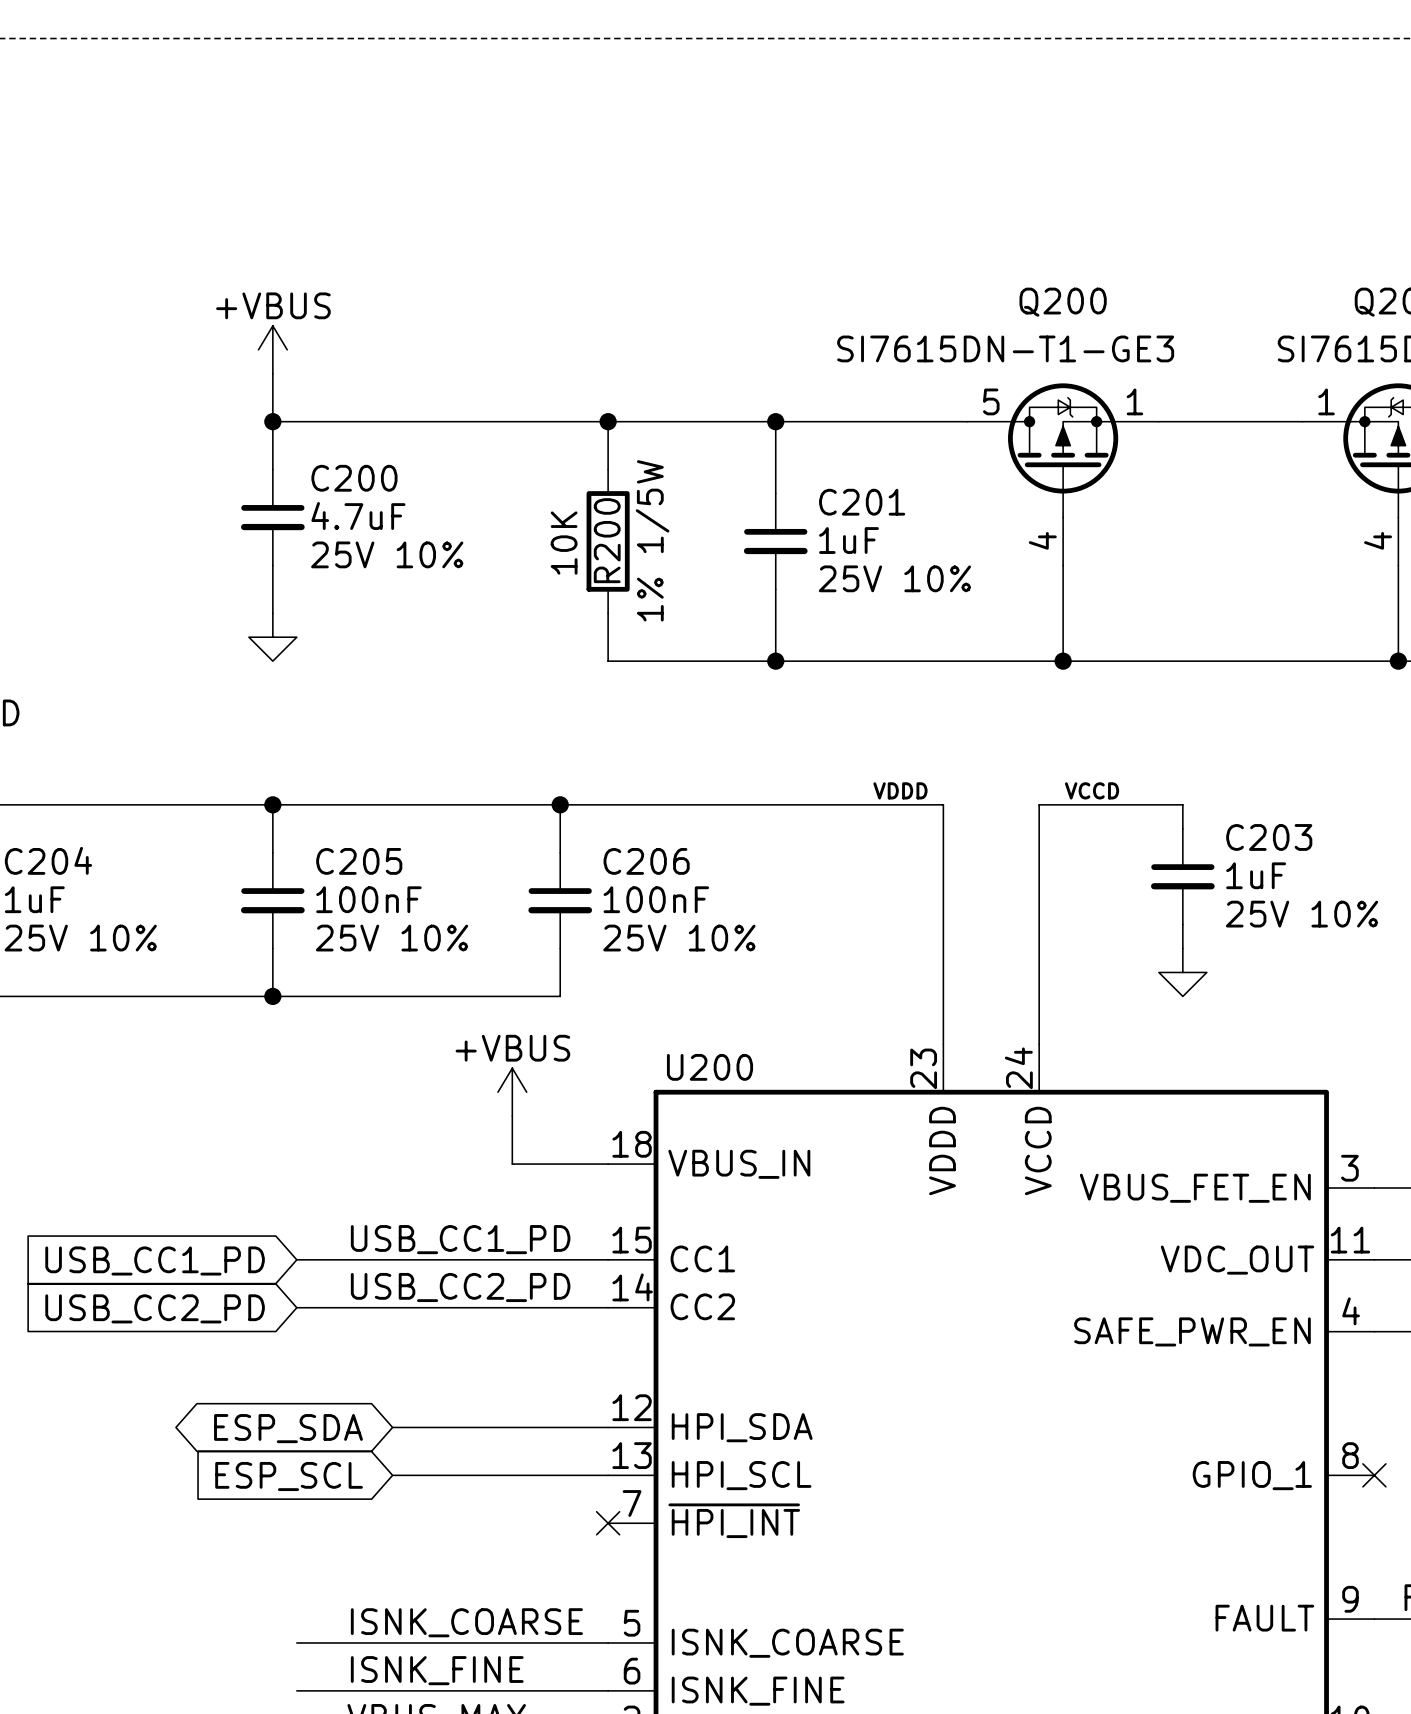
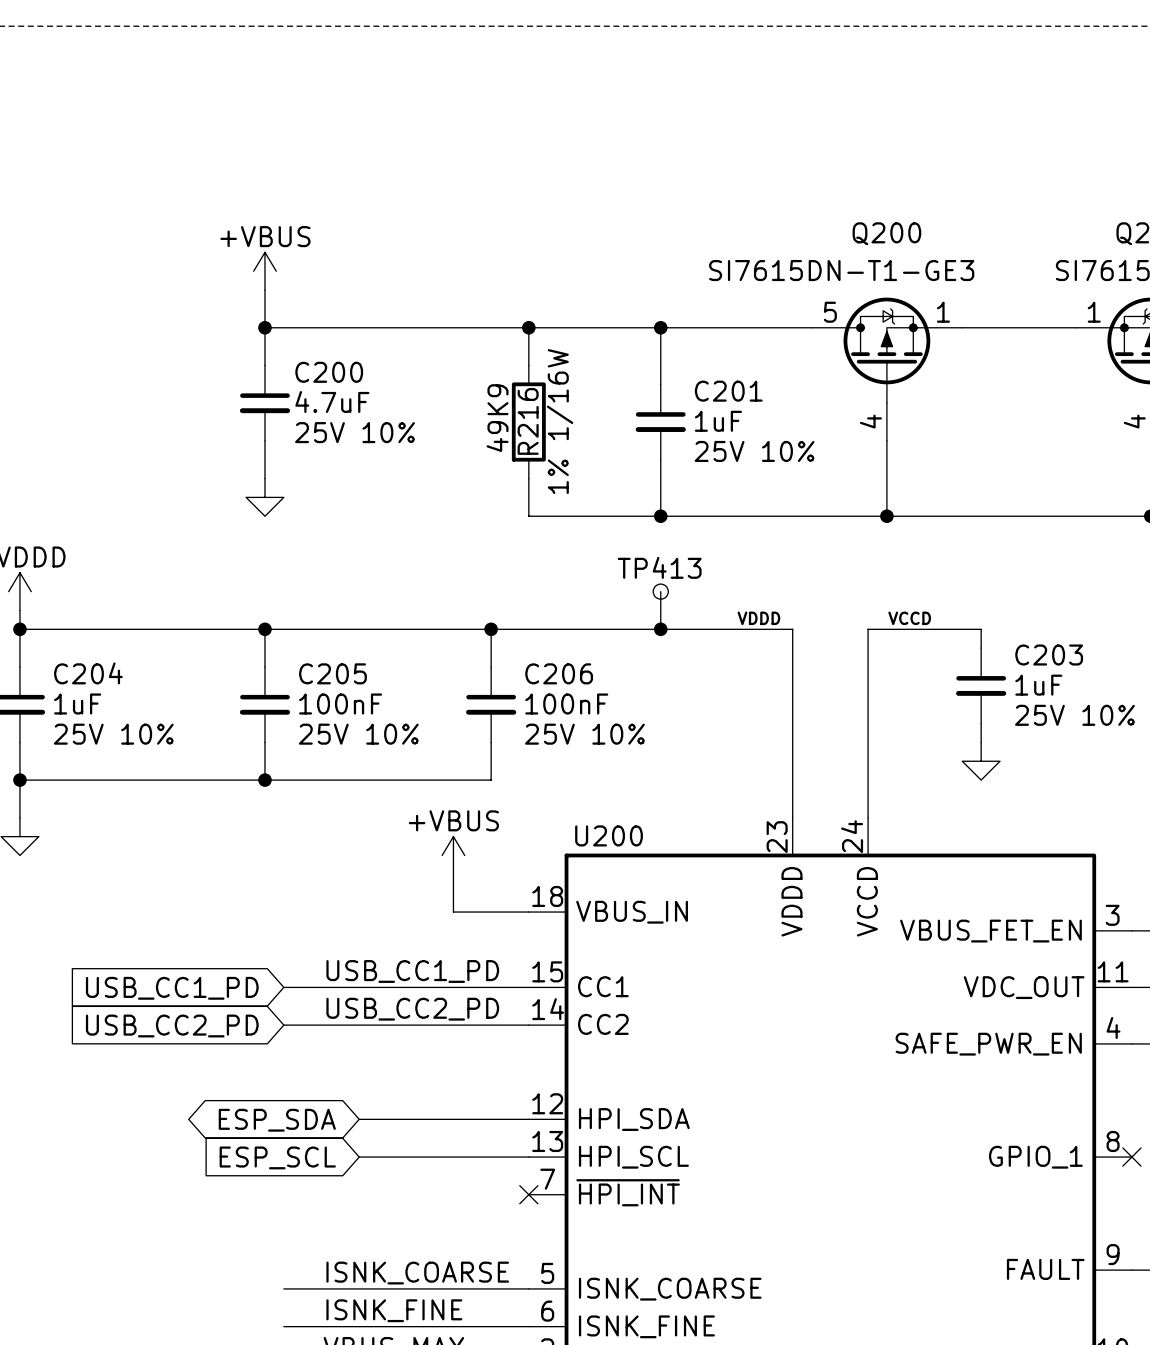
R200 name: R200 (607, 540) -> R216 (528, 421)
R200 text: 1% 1/5W (652, 540) -> 1% 1/16W (560, 421)
R200 value: 10K (564, 543) -> 49K9 (497, 418)
wire: none -> (660, 591) (660, 629)
TP413: none -> (660, 591)
junction: none -> (660, 629)

